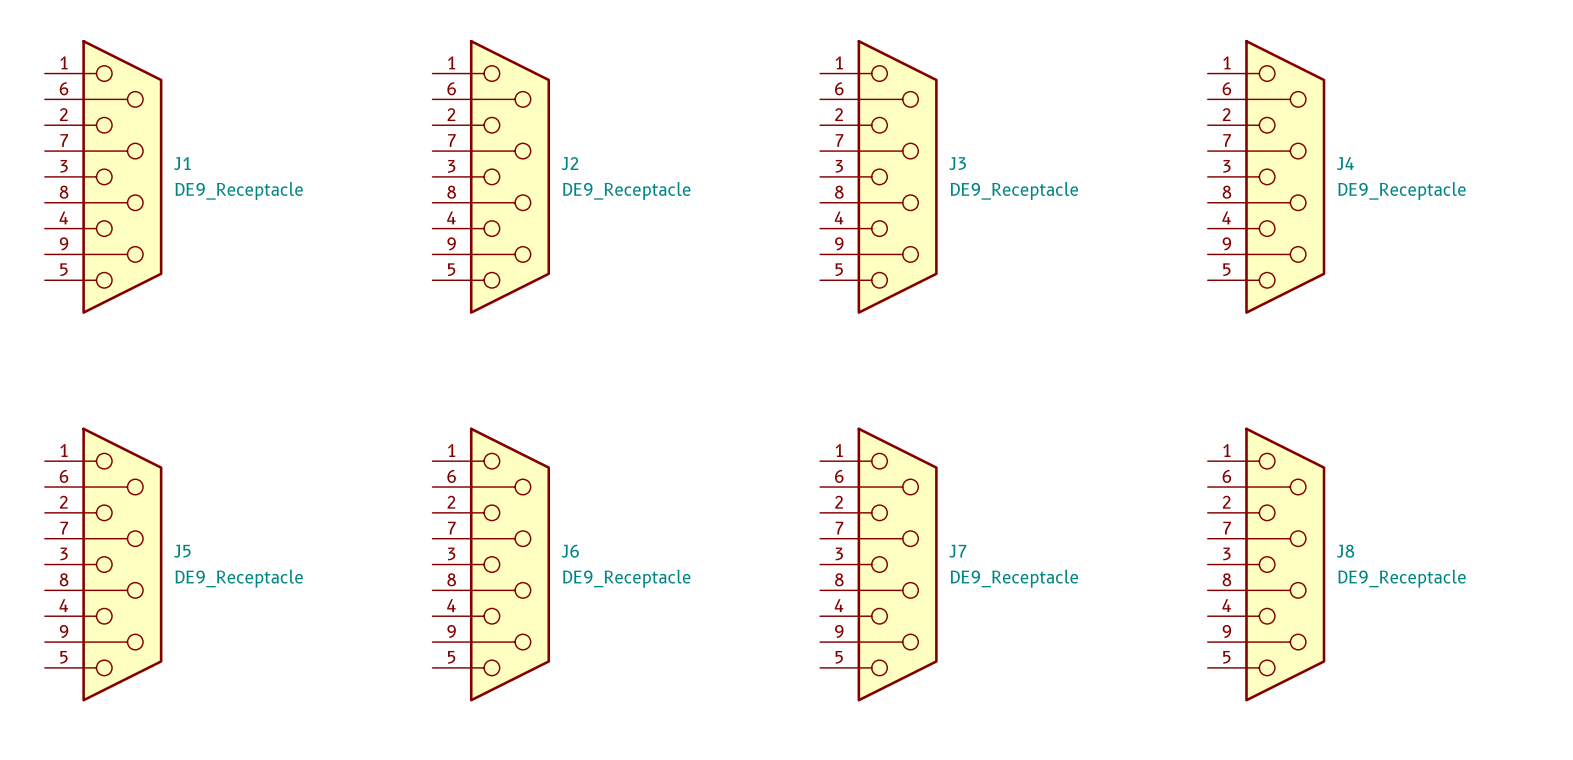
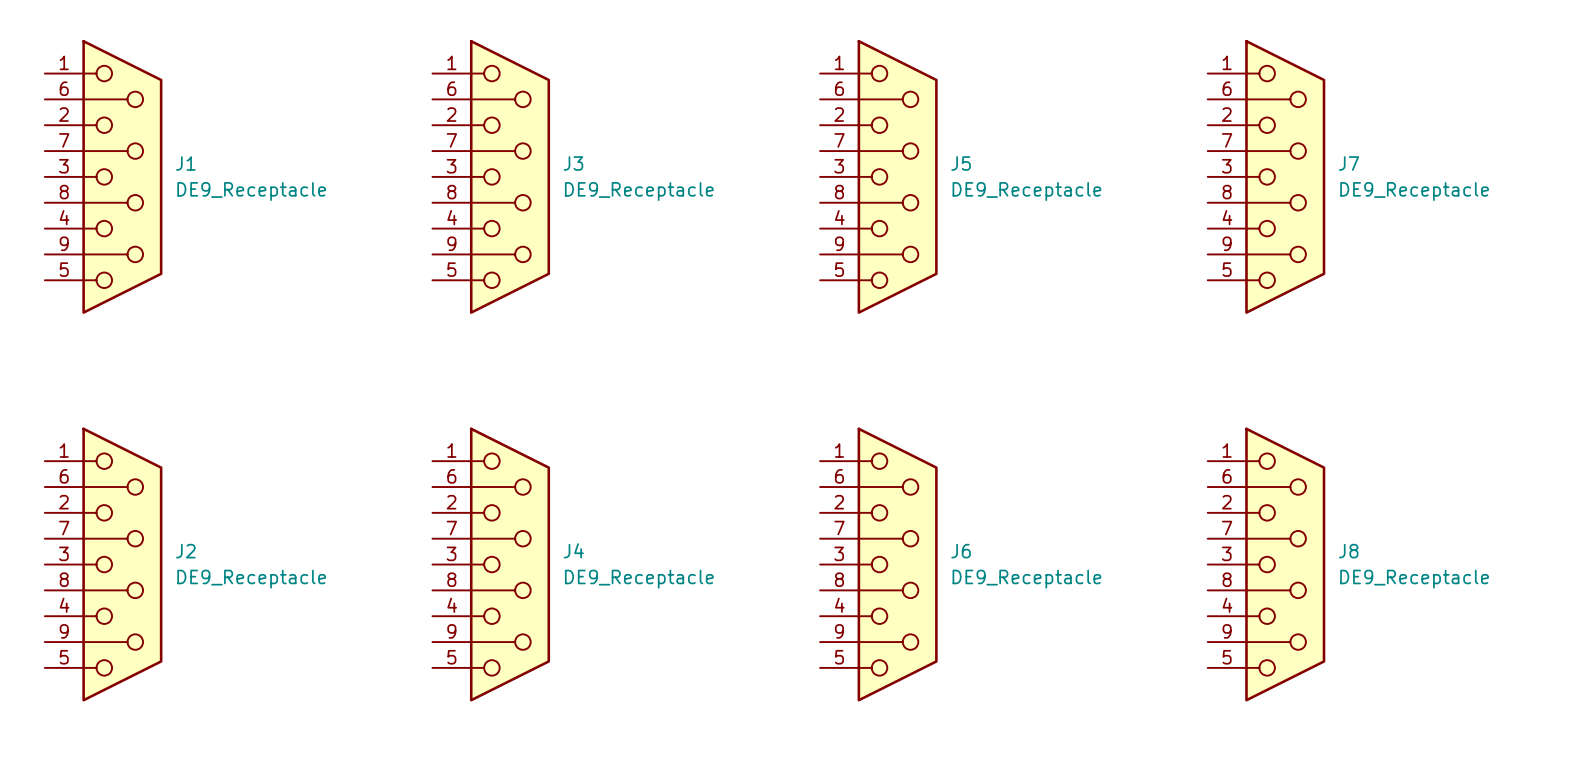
J2 name: J2 (569, 163) -> J3 (573, 163)
J3 name: J3 (957, 163) -> J5 (961, 163)
J4 name: J4 (1345, 163) -> J7 (1349, 163)
J5 name: J5 (182, 551) -> J2 (185, 551)
J6 name: J6 (570, 551) -> J4 (573, 550)
J7 name: J7 (957, 551) -> J6 (961, 551)

